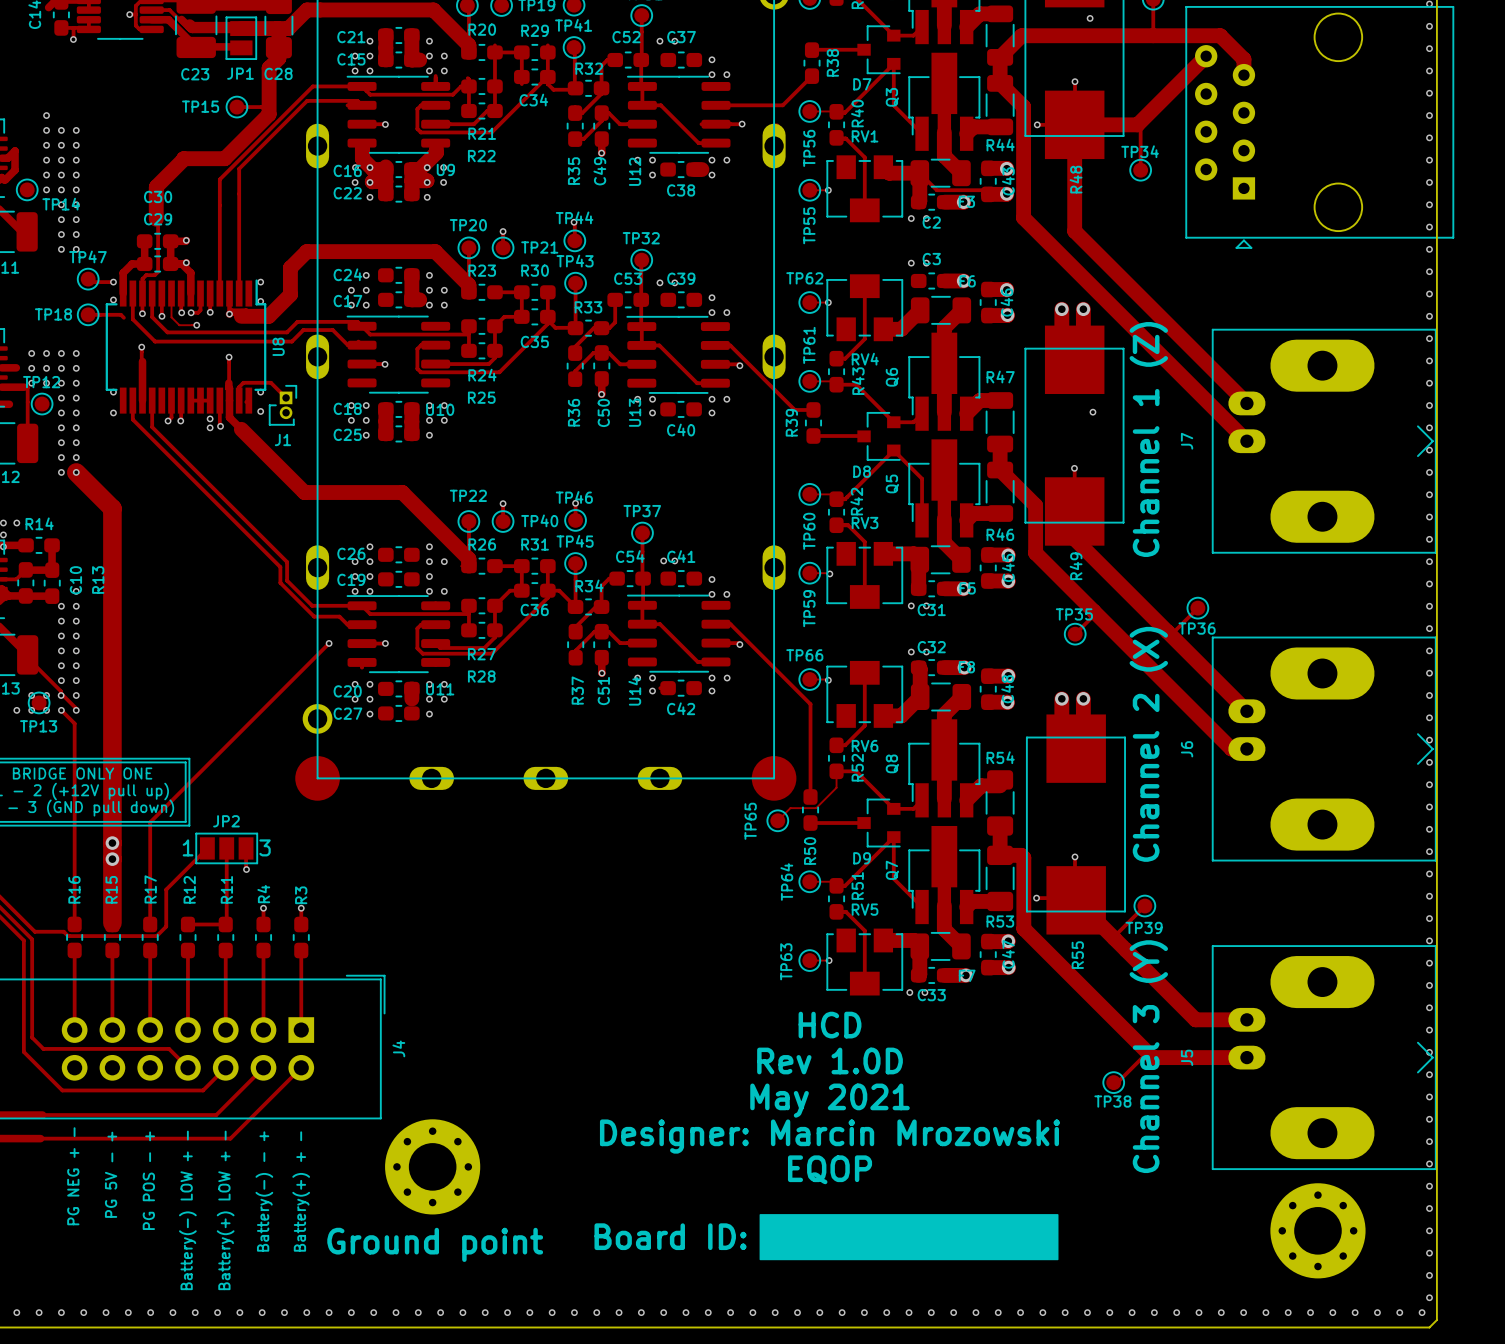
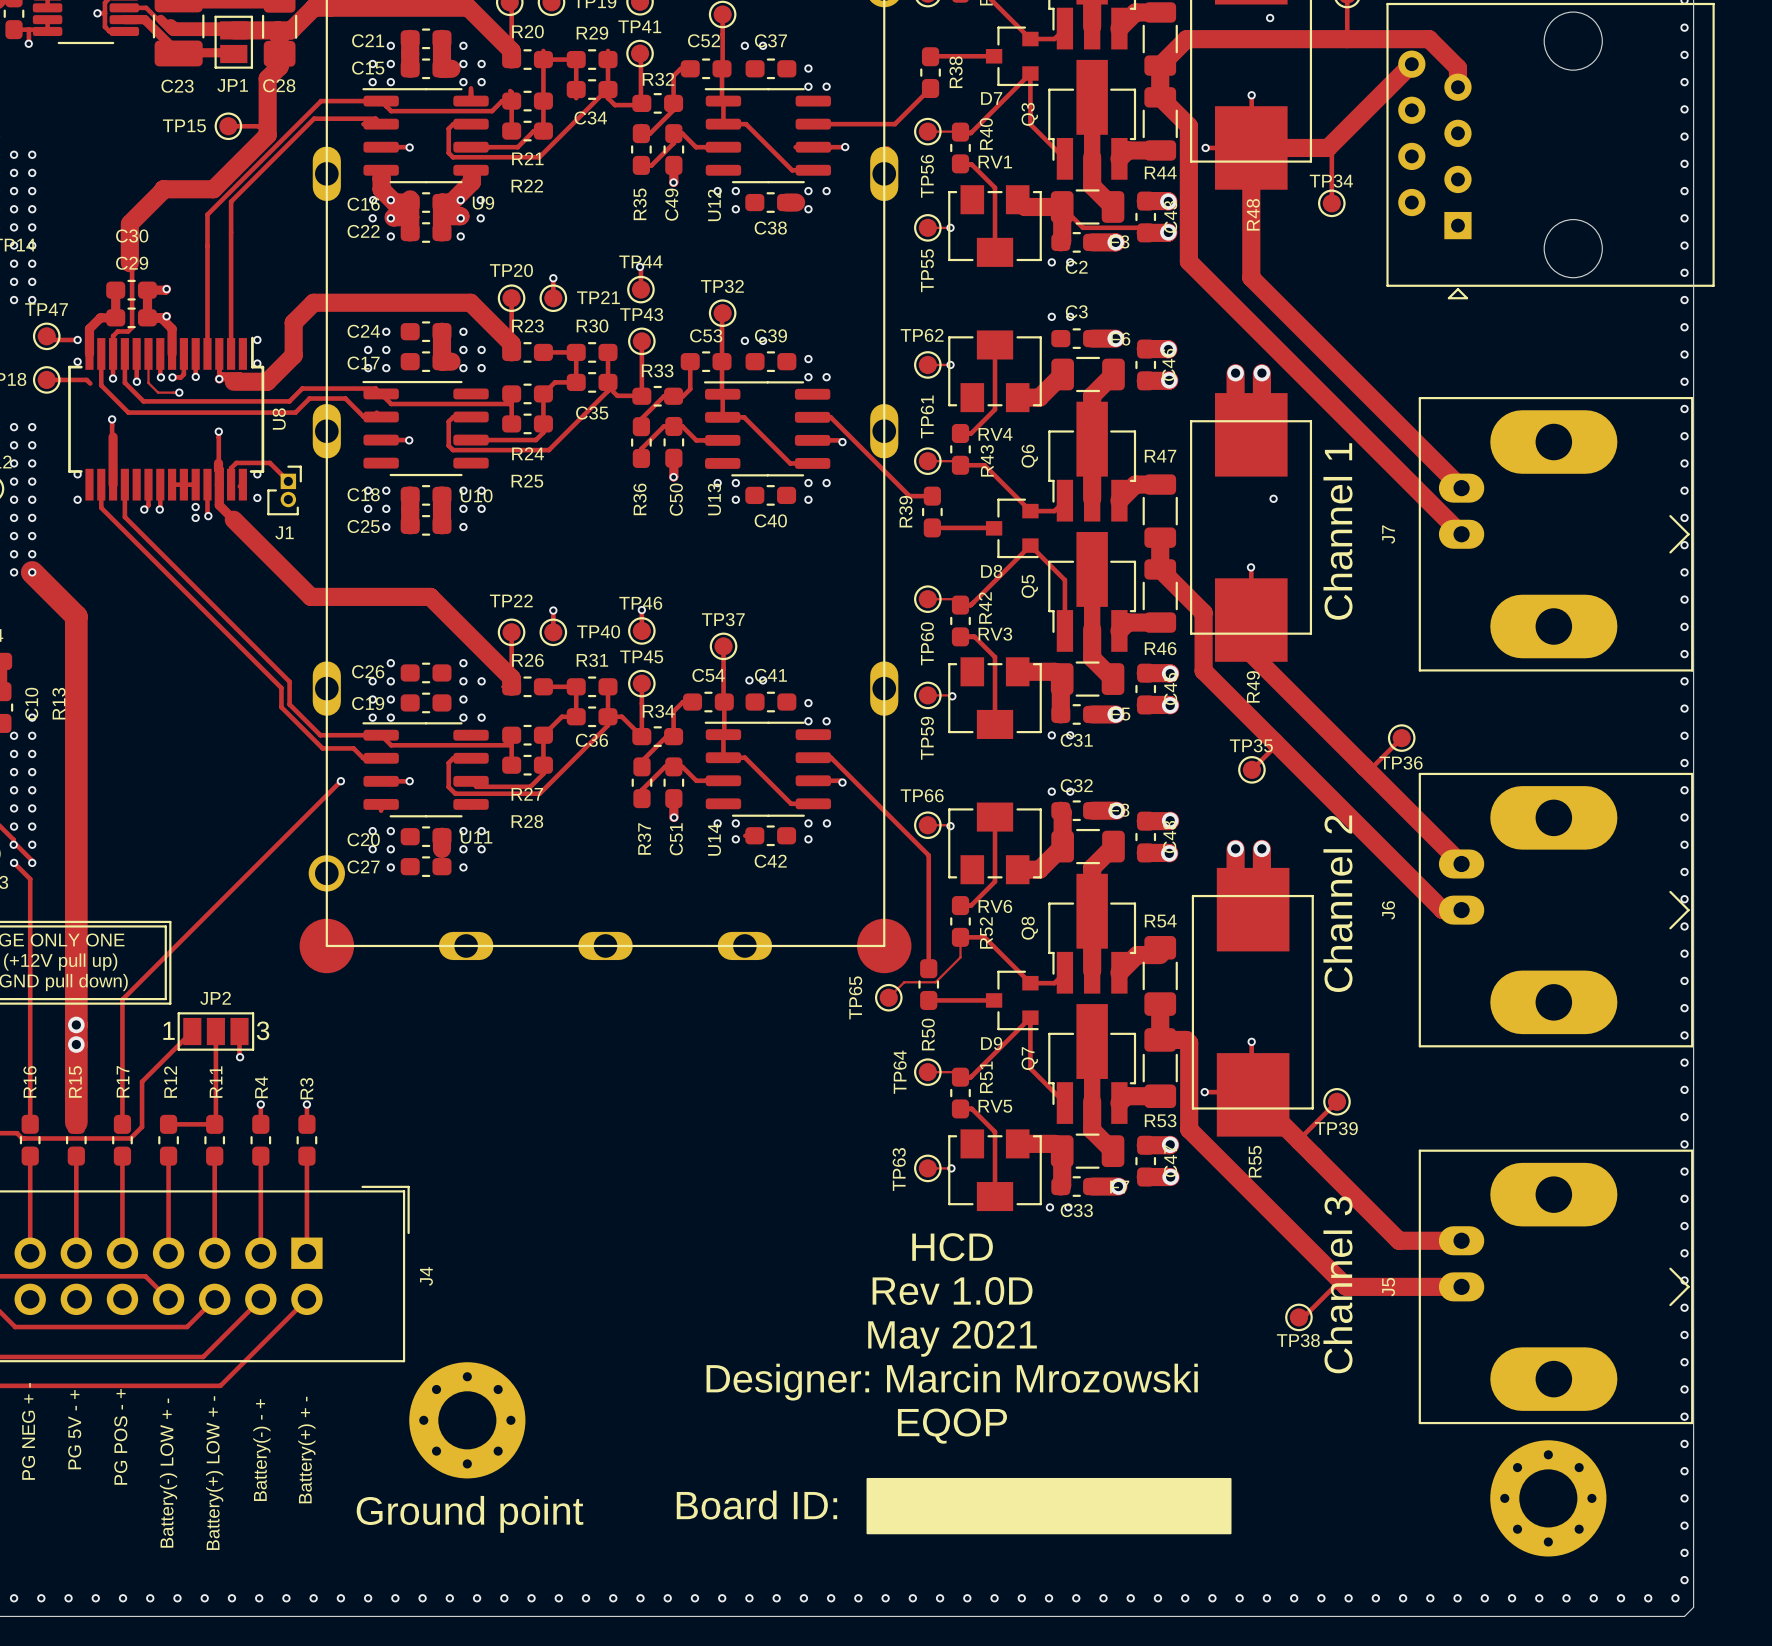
text: Channel 1 (Z) (1148, 439) -> Channel 1 (1337, 531)
text: Channel 2 (X) (1148, 744) -> Channel 2 (1337, 903)
text: Channel 3 (Y) (1148, 1056) -> Channel 3 (1337, 1284)

